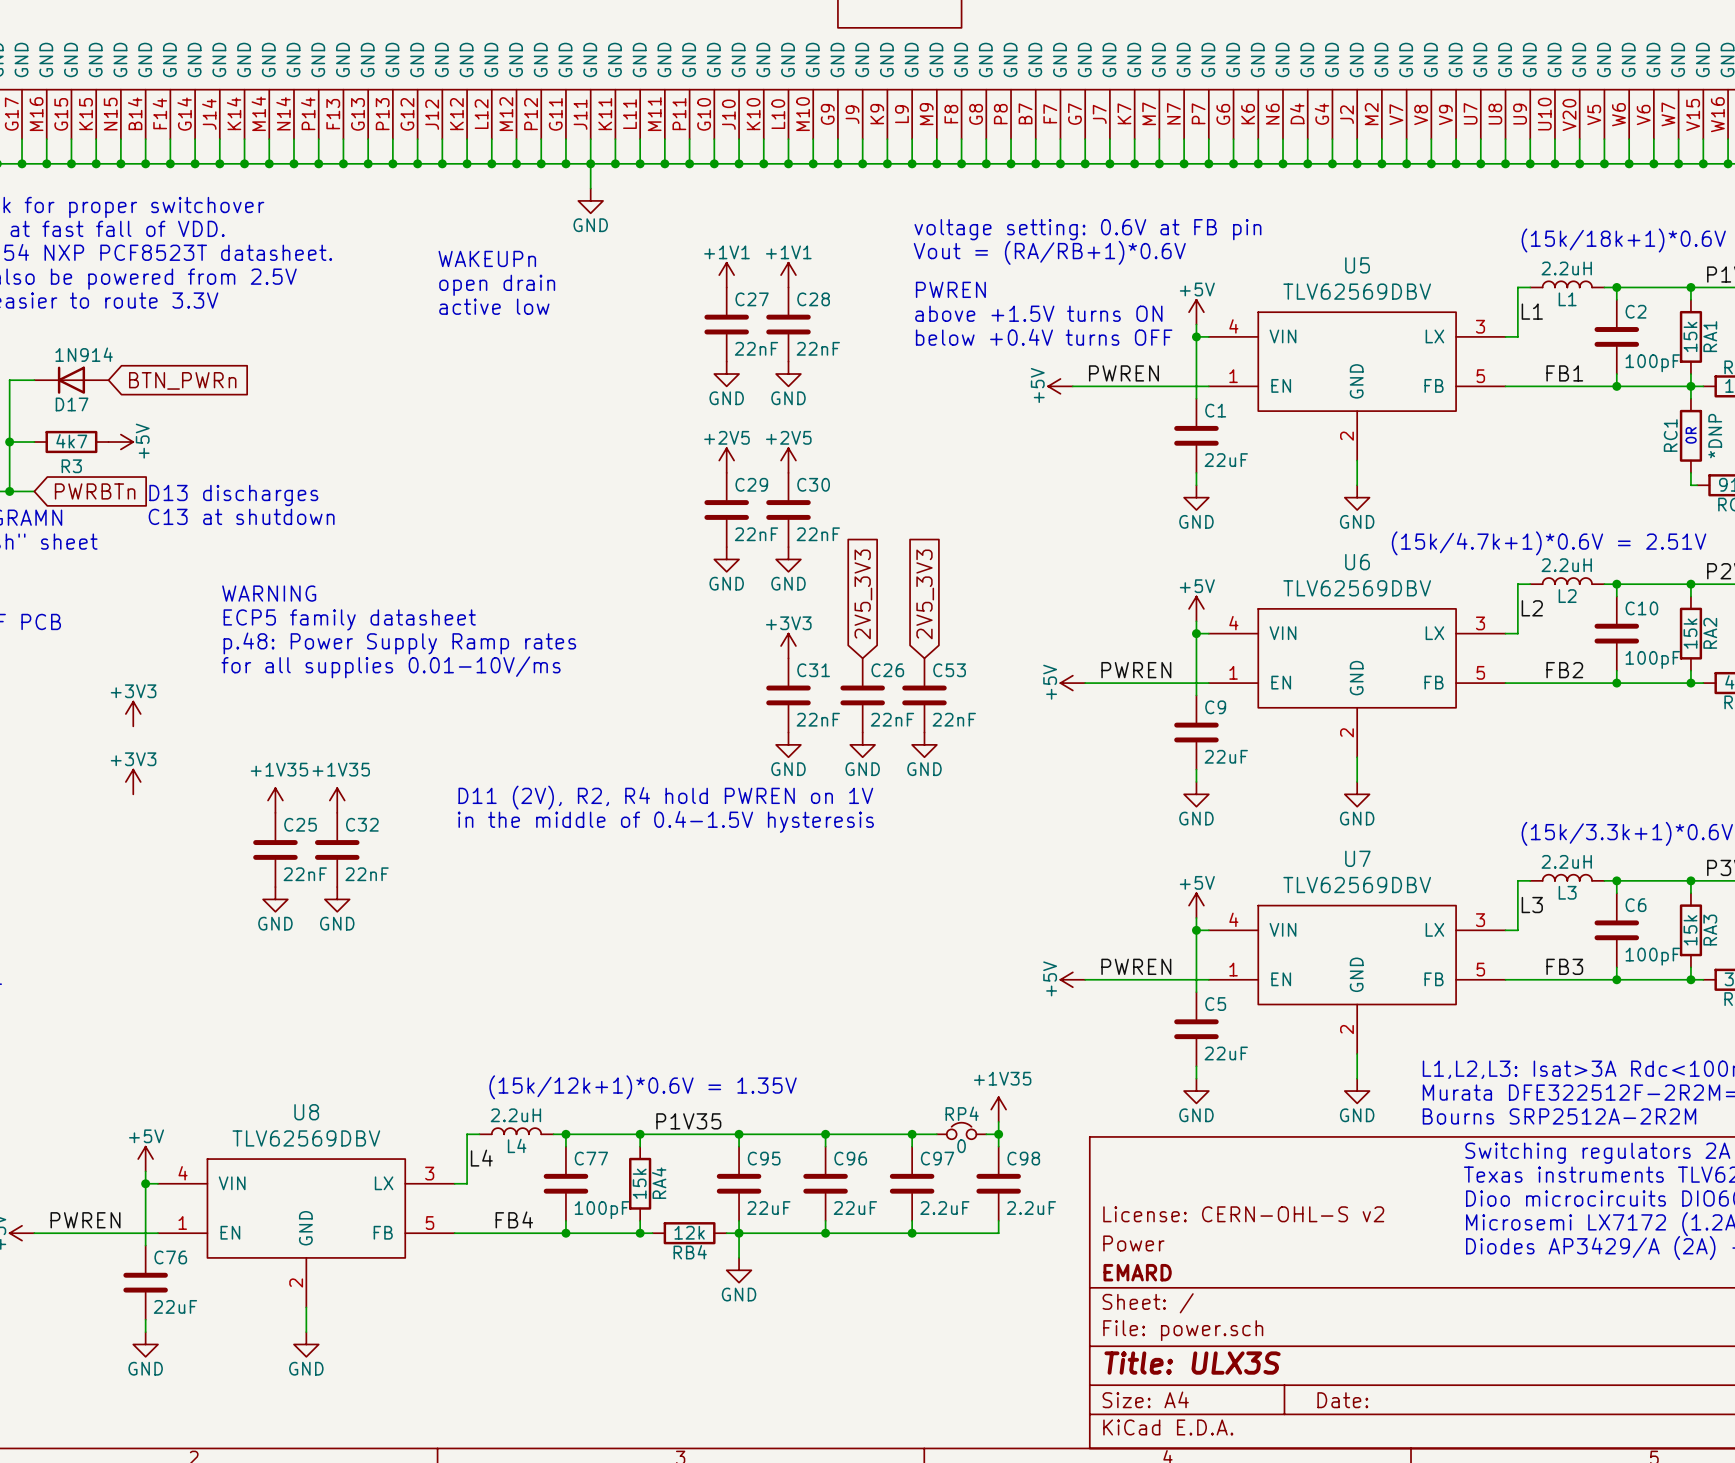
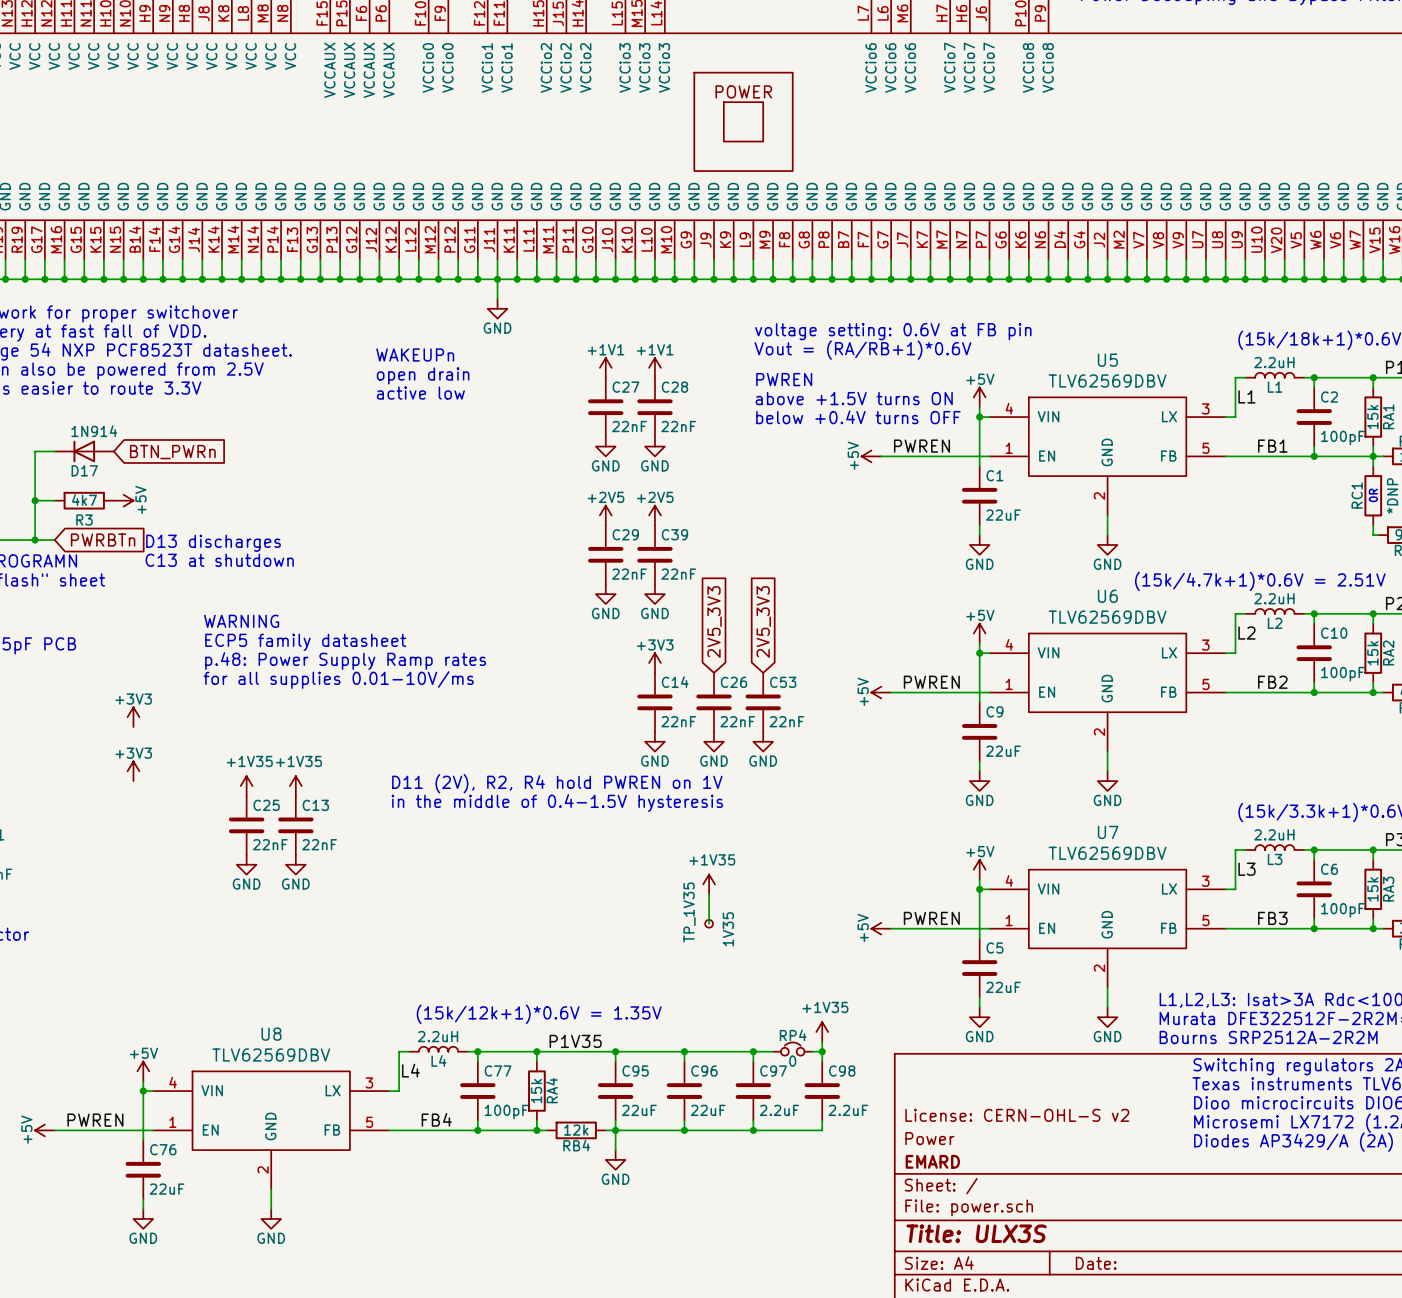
C30 name: C30 (813, 484) -> C39 (674, 534)
C31 name: C31 (813, 670) -> C14 (675, 682)
C32 name: C32 (362, 824) -> C13 (315, 805)
power symbol: none -> +1V35 (709, 884)
wire: none -> (709, 894) (709, 923)
TP_1V35: none -> 1V35 (709, 923)

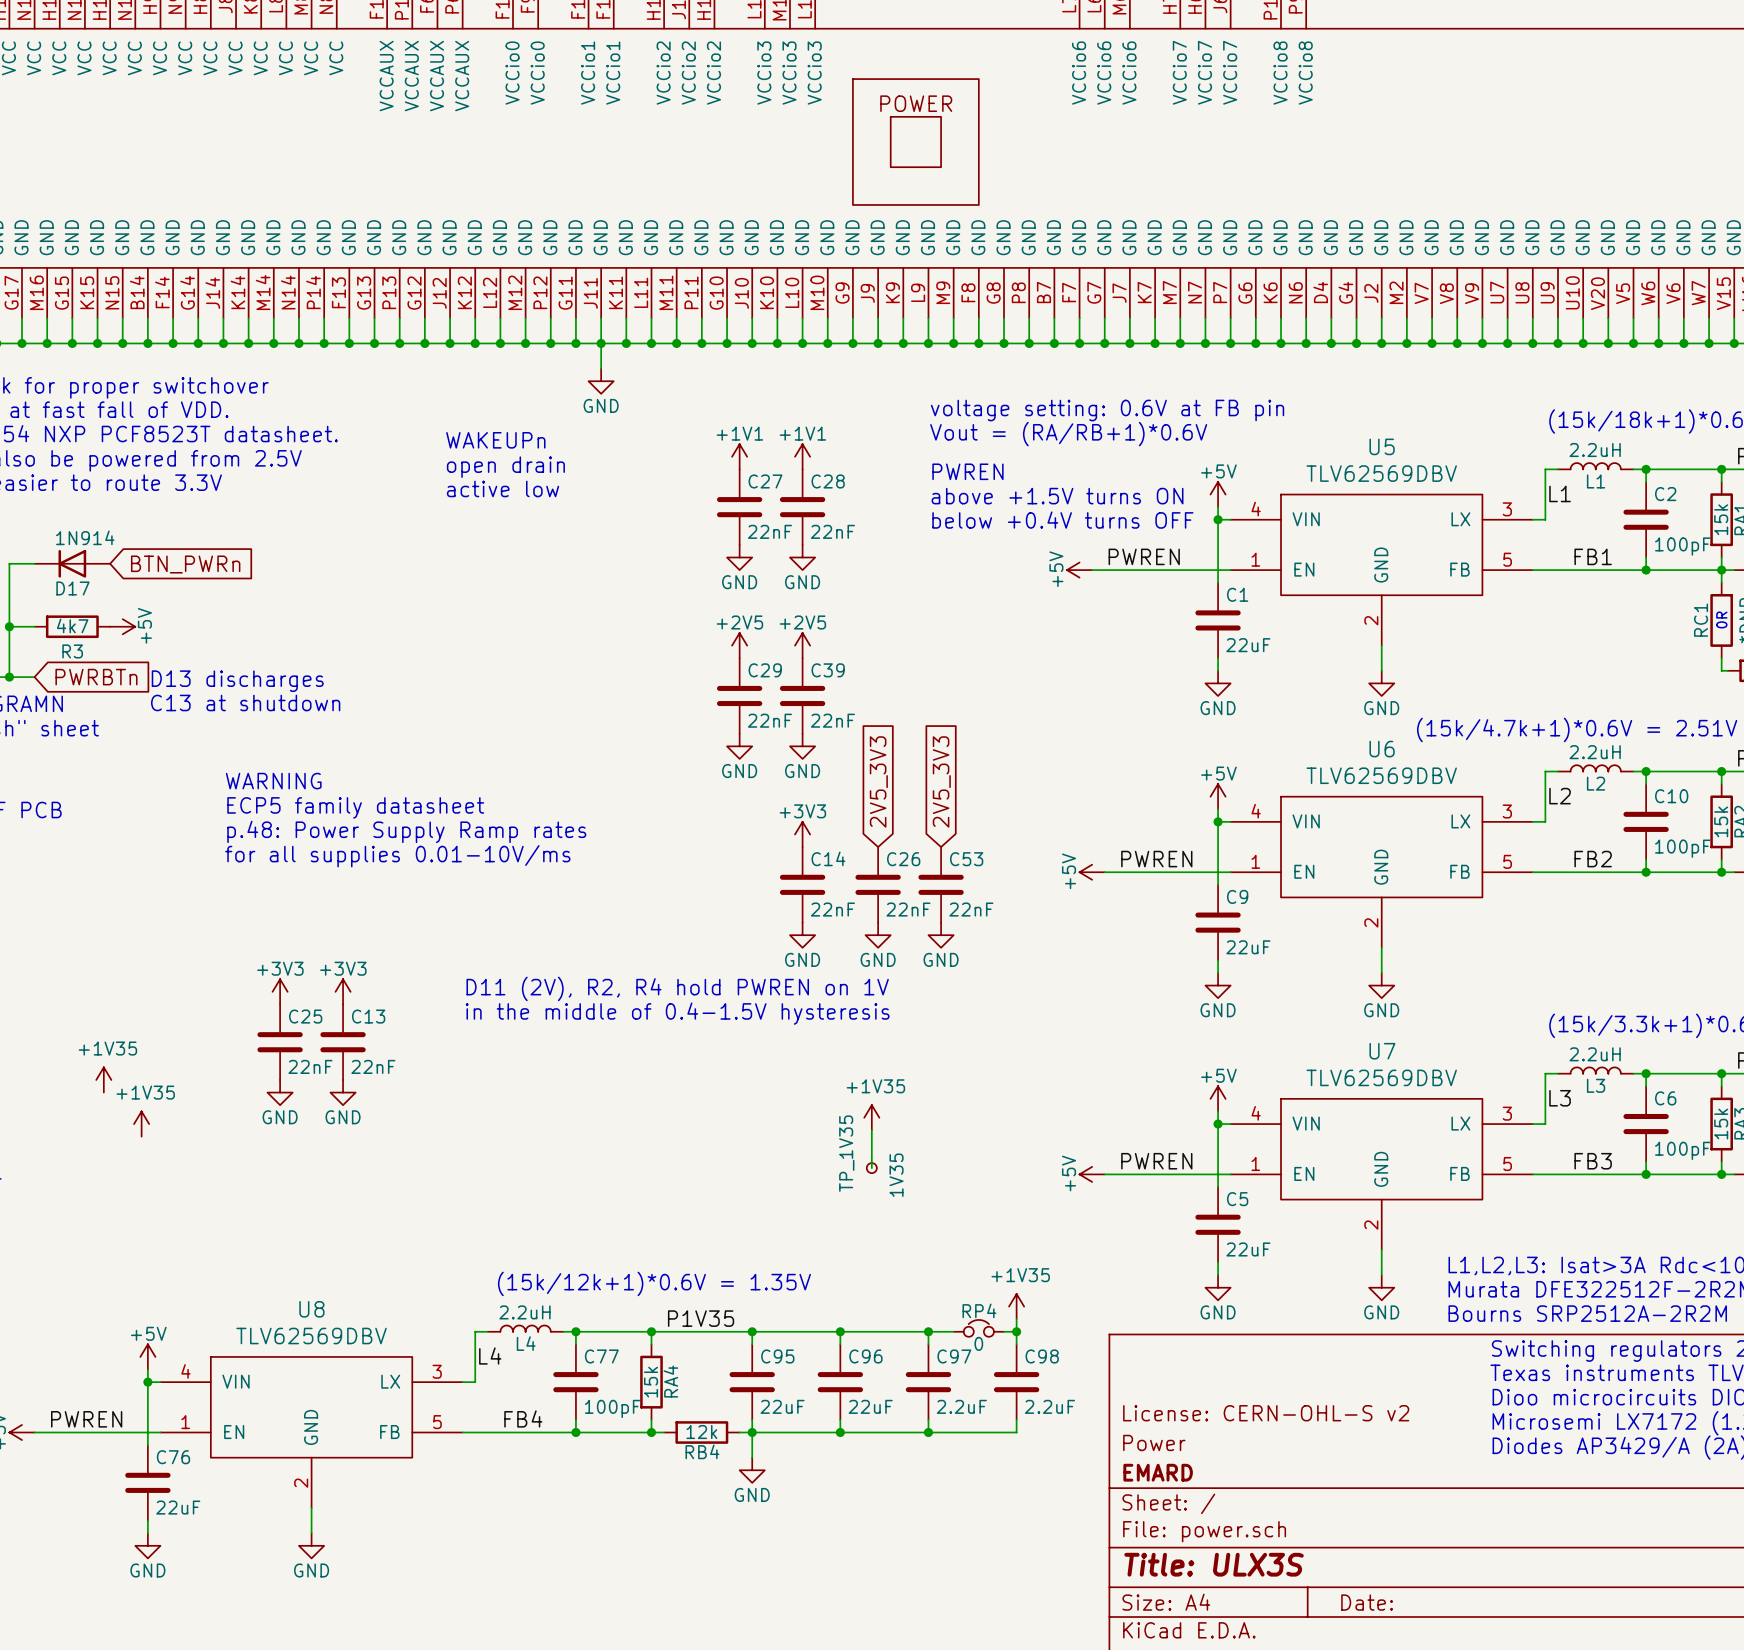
power symbol: +3V3 (133, 717) -> none
power symbol: +3V3 (133, 771) -> none
power symbol: +1V35 (246, 786) -> +3V3 (280, 991)
power symbol: +1V35 (295, 786) -> +3V3 (343, 991)
power symbol: none -> +1V35 (103, 1079)
power symbol: none -> +1V35 (141, 1124)

